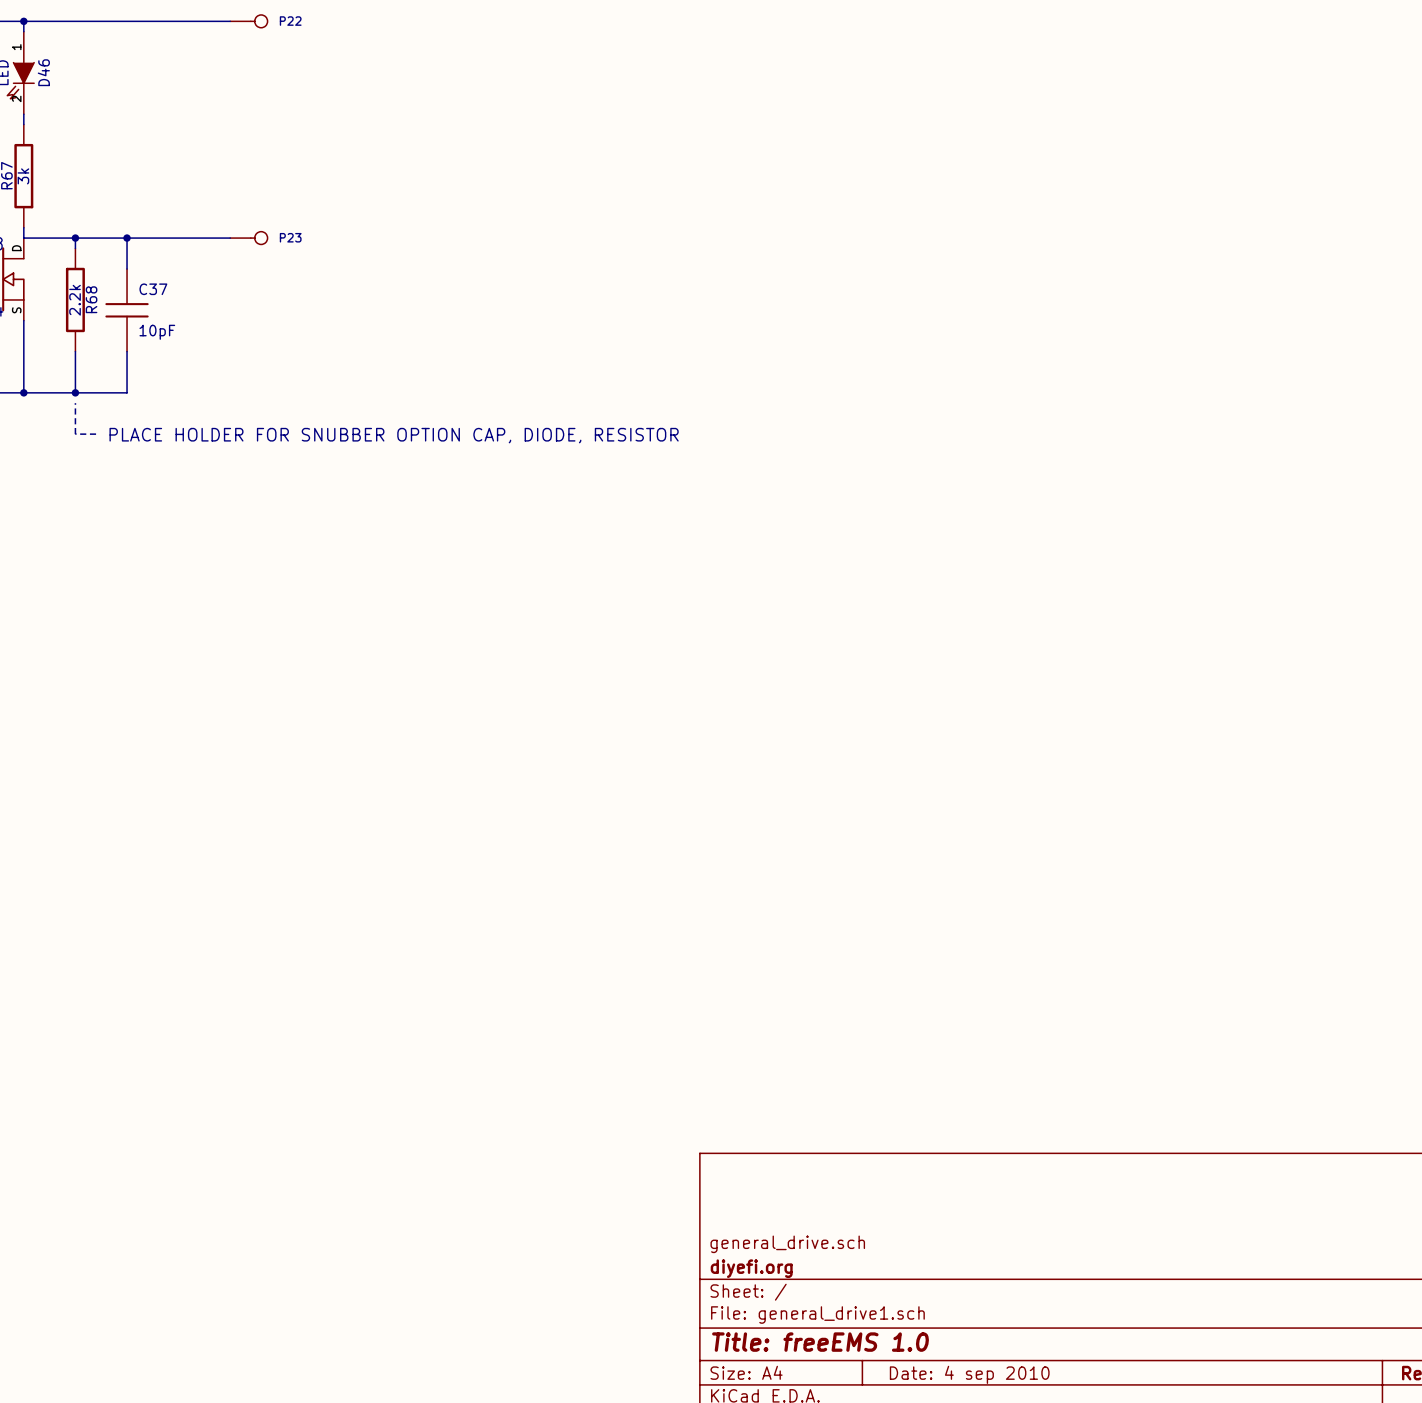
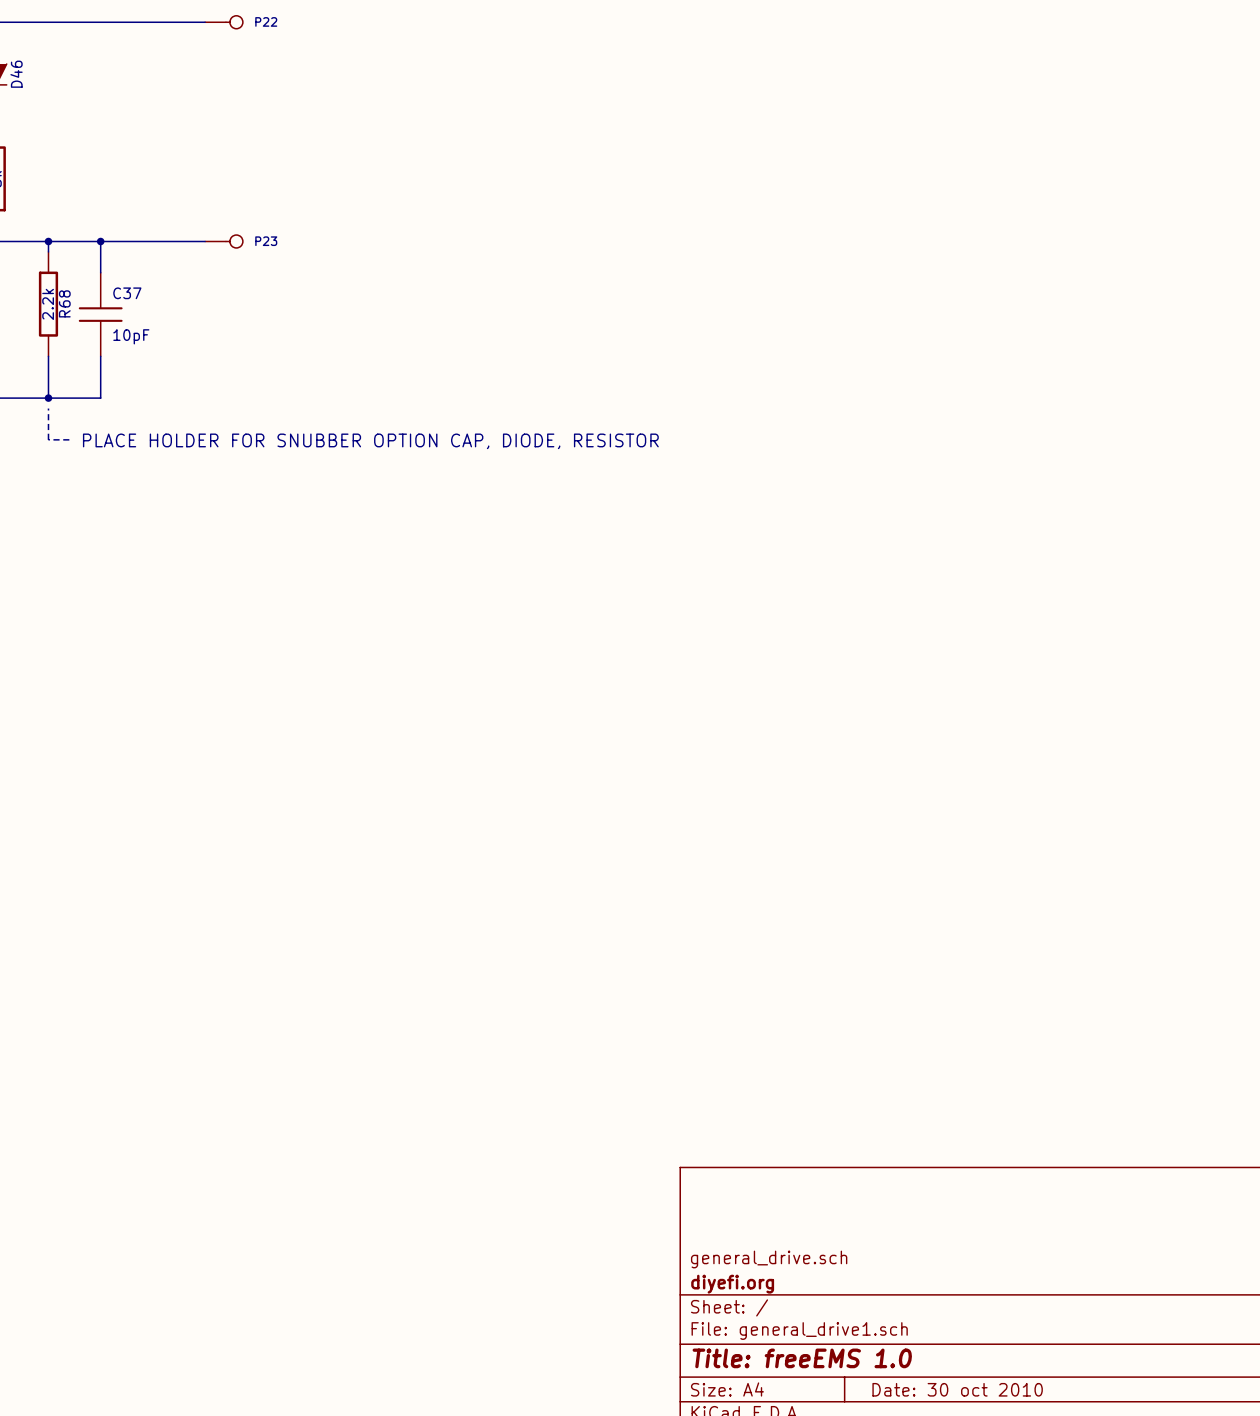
title block: Date: 4 sep 2010 (969, 1374) -> Date: 30 oct 2010 (957, 1389)

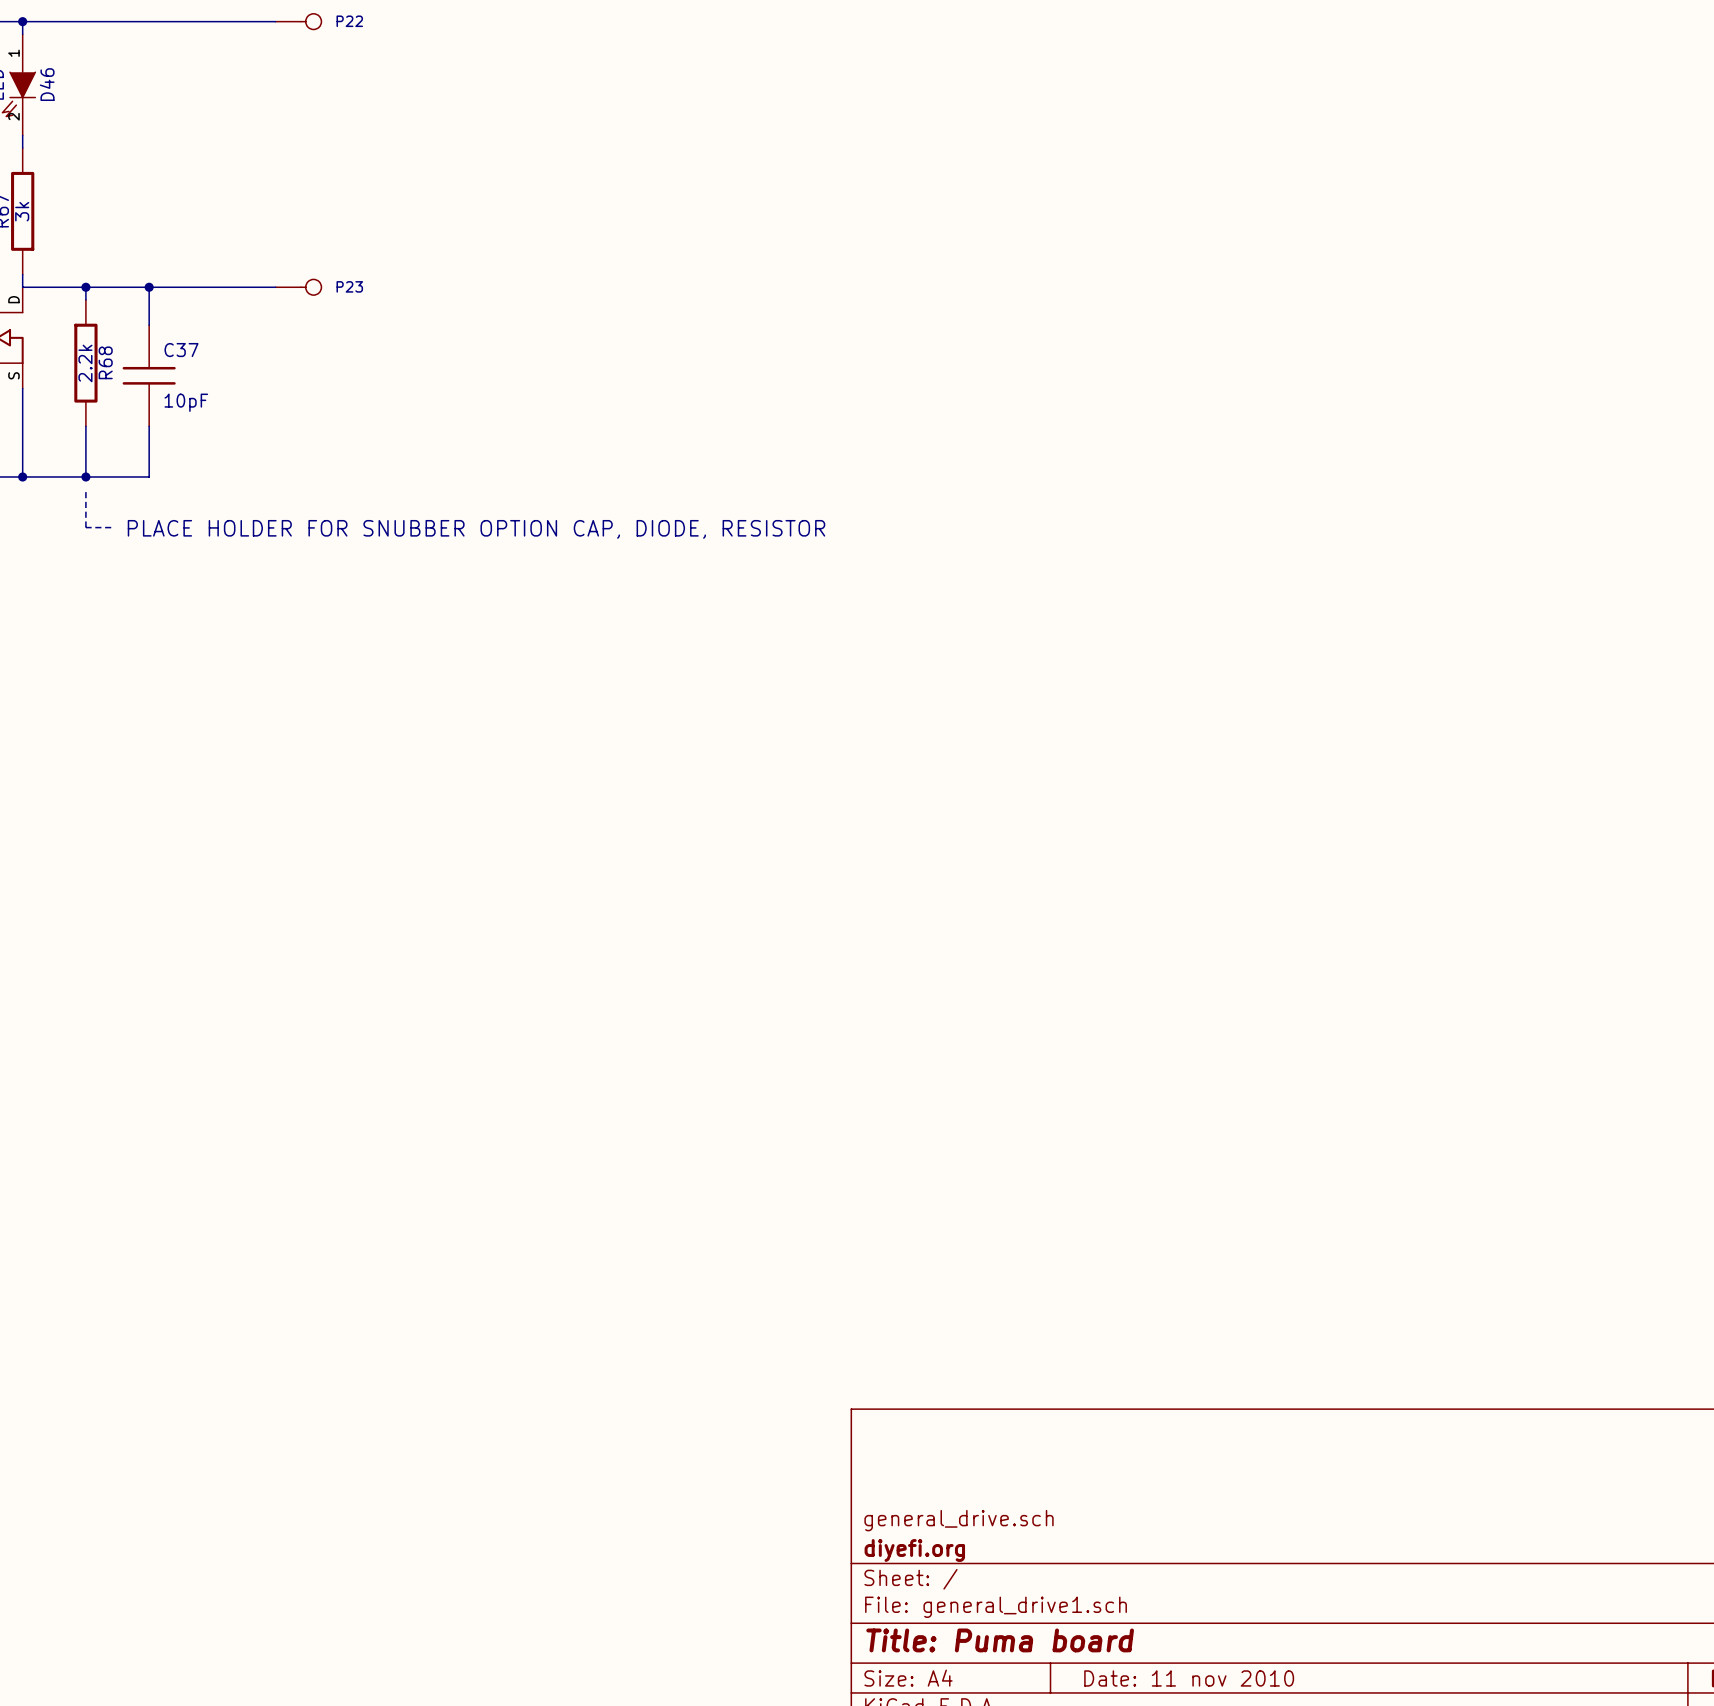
title block: Title: freeEMS 1.0 (802, 1358) -> Title: Puma board (1000, 1640)
title block: Date: 30 oct 2010 (957, 1389) -> Date: 11 nov 2010 (1189, 1678)

